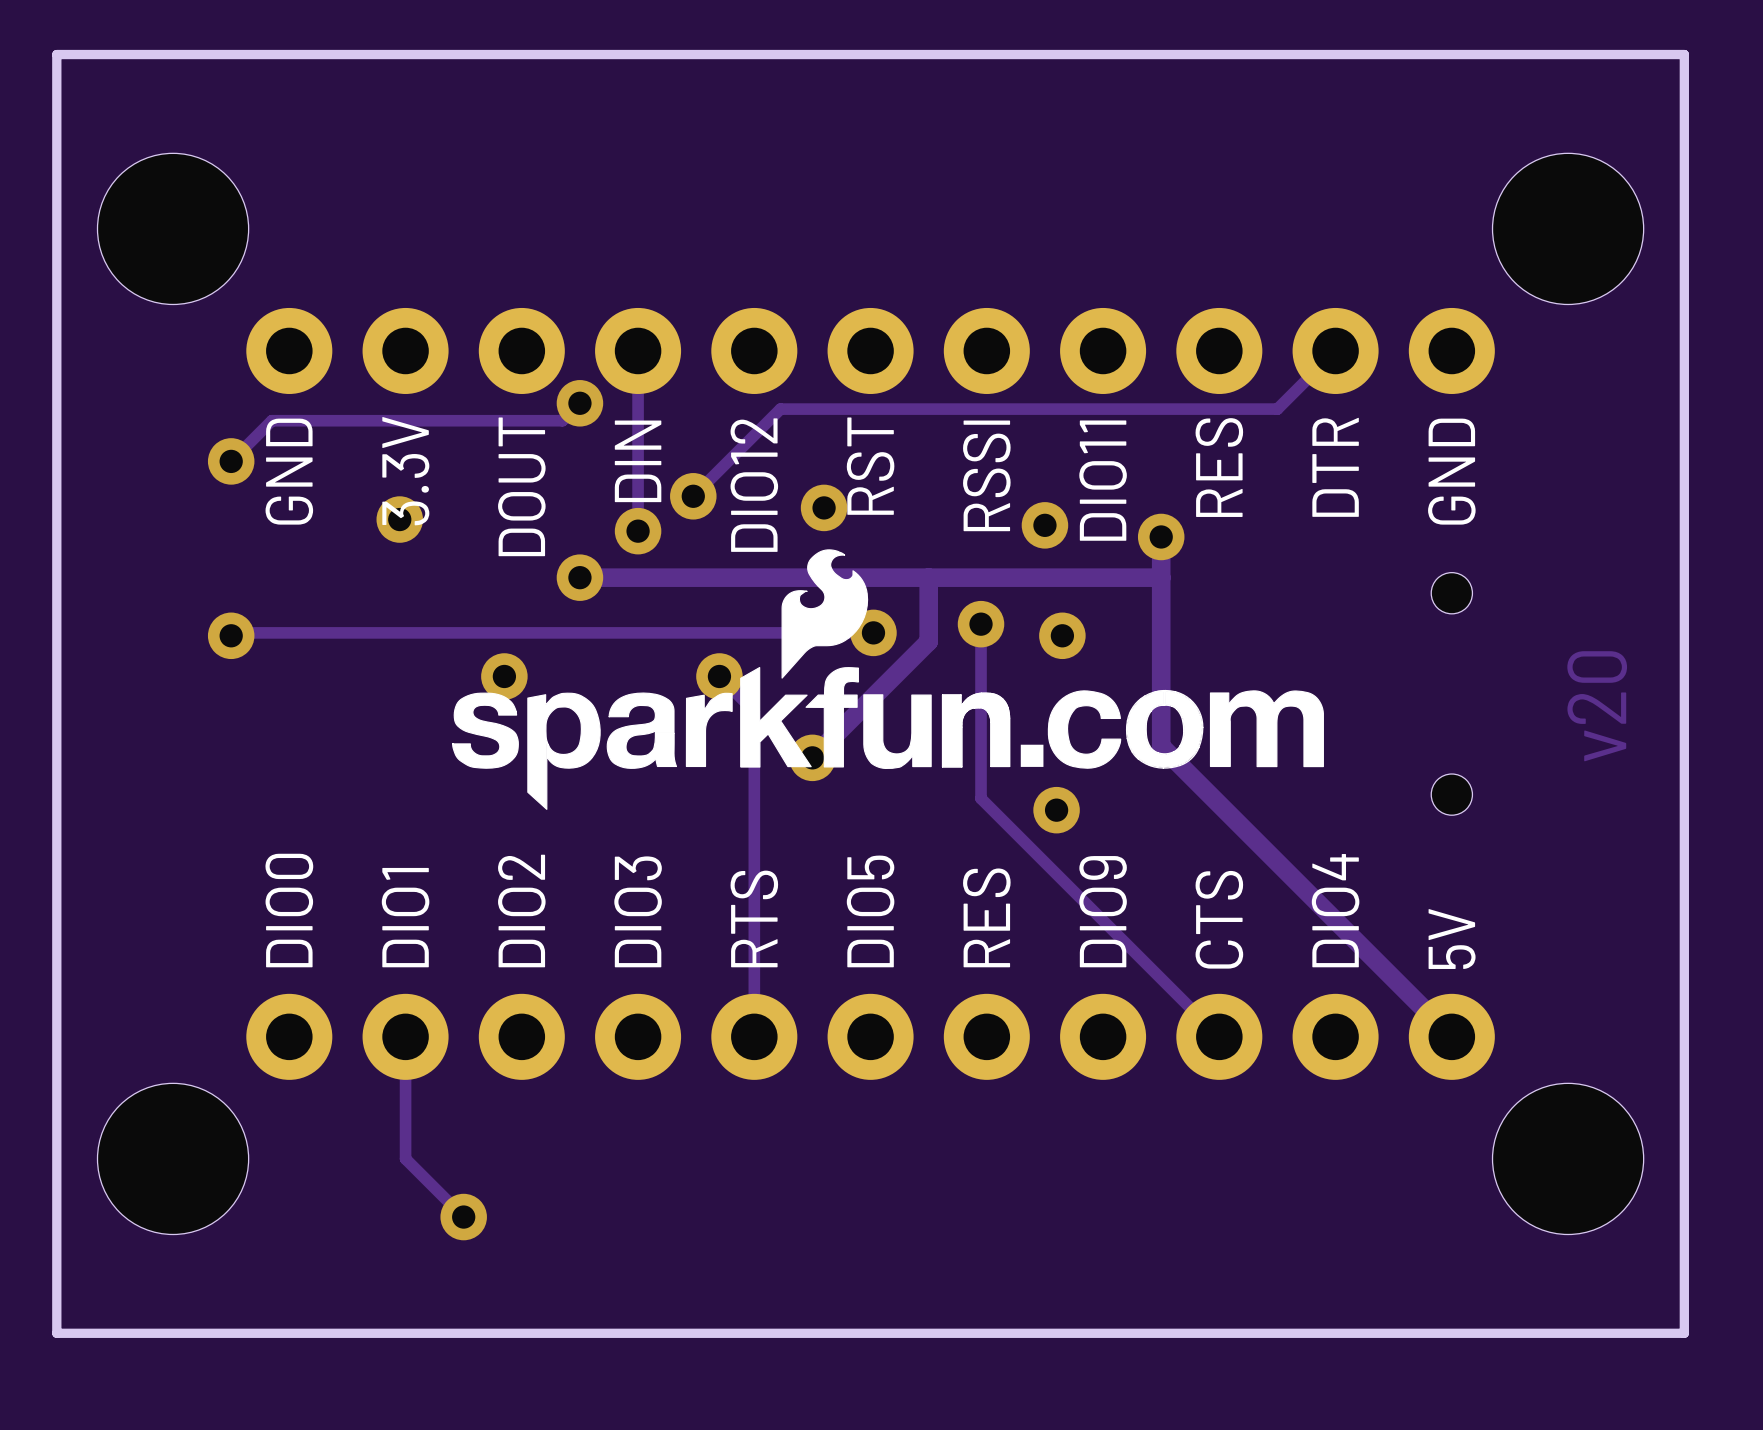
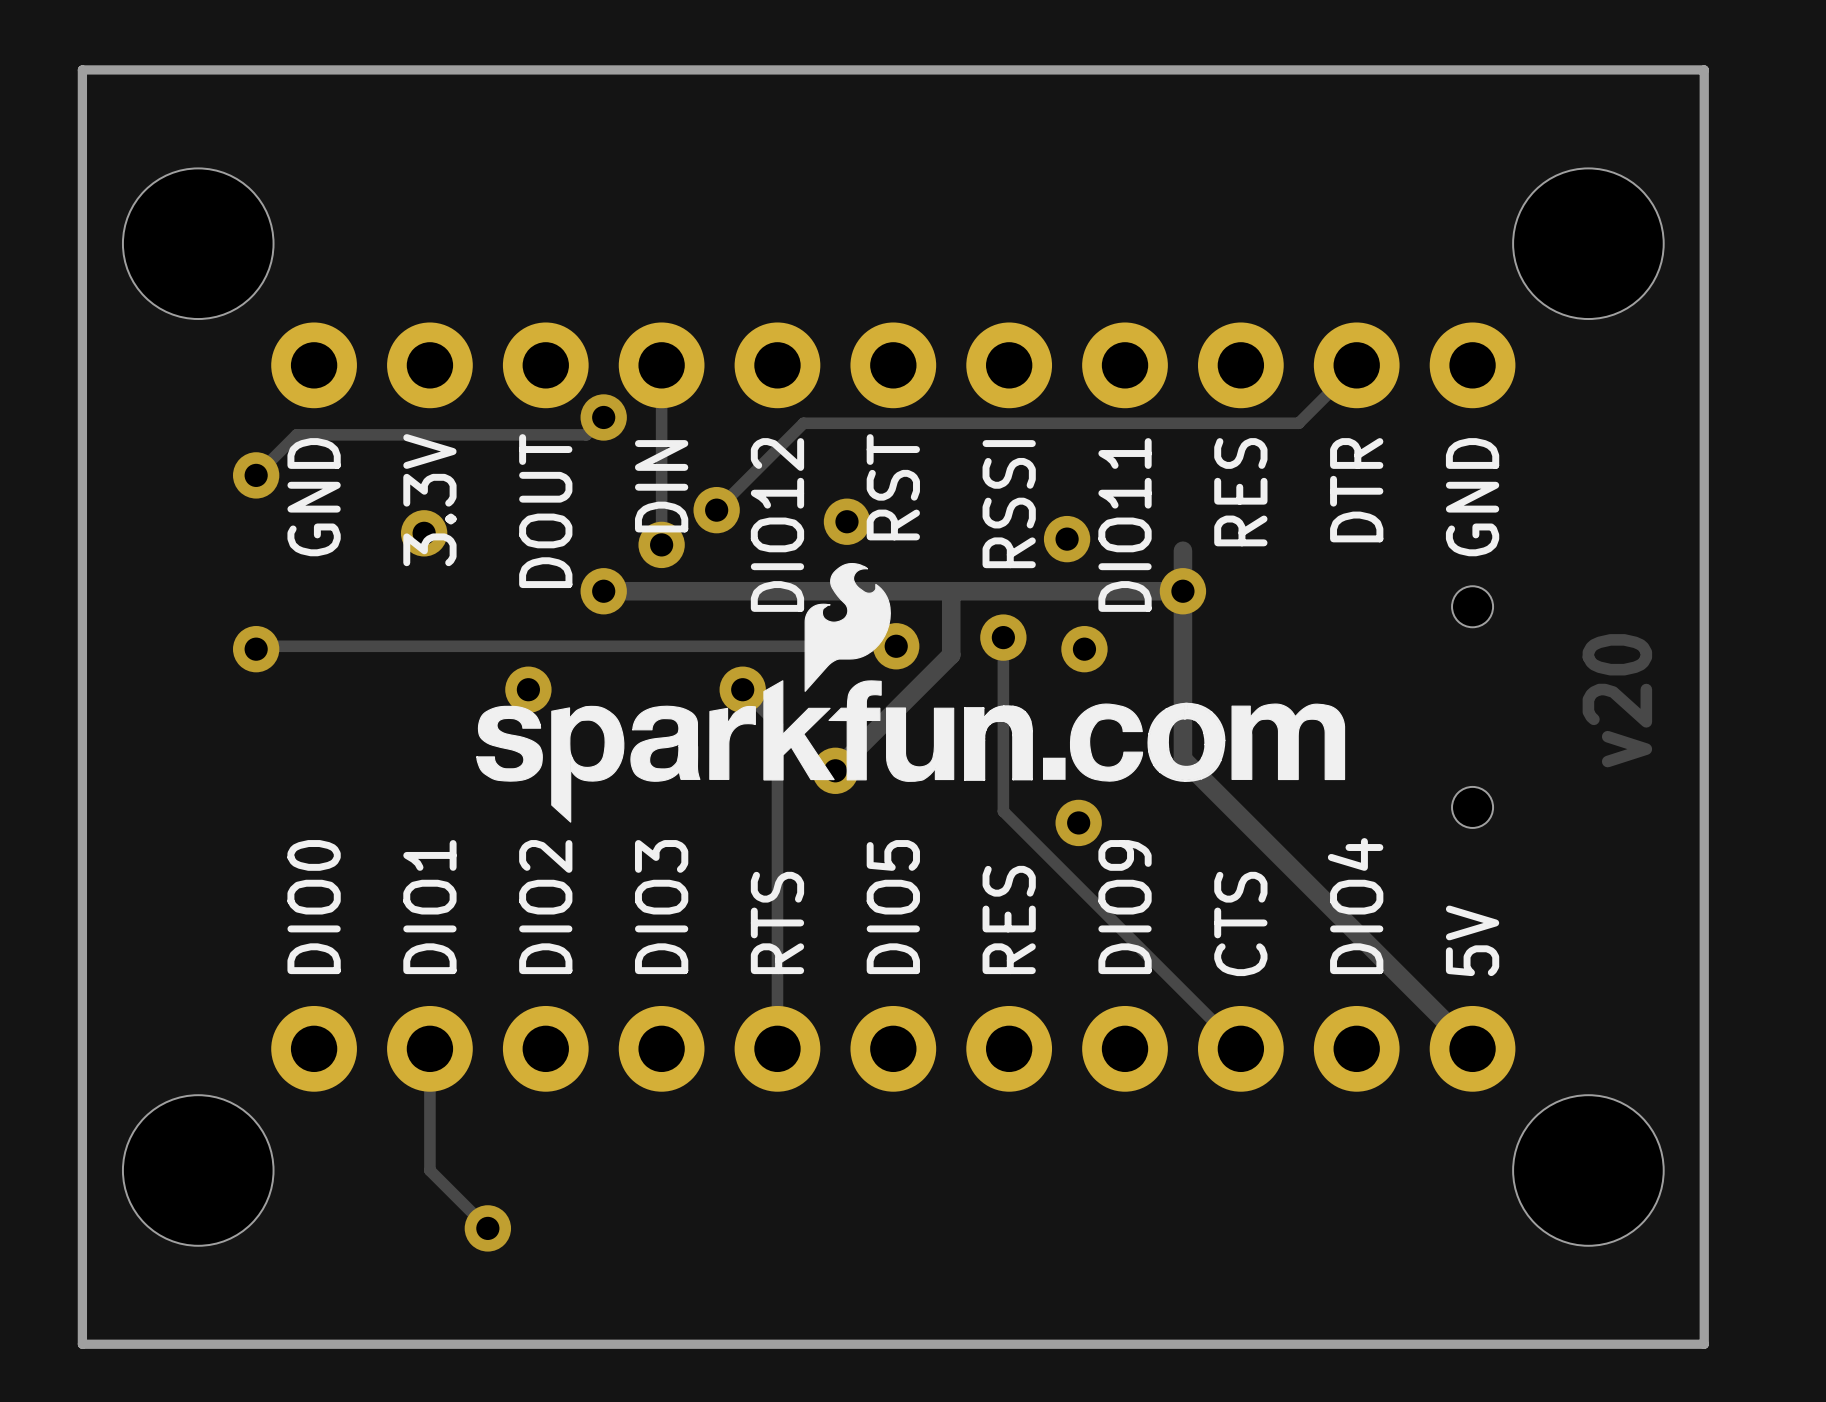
via position: (1161, 536) -> (1182, 591)

